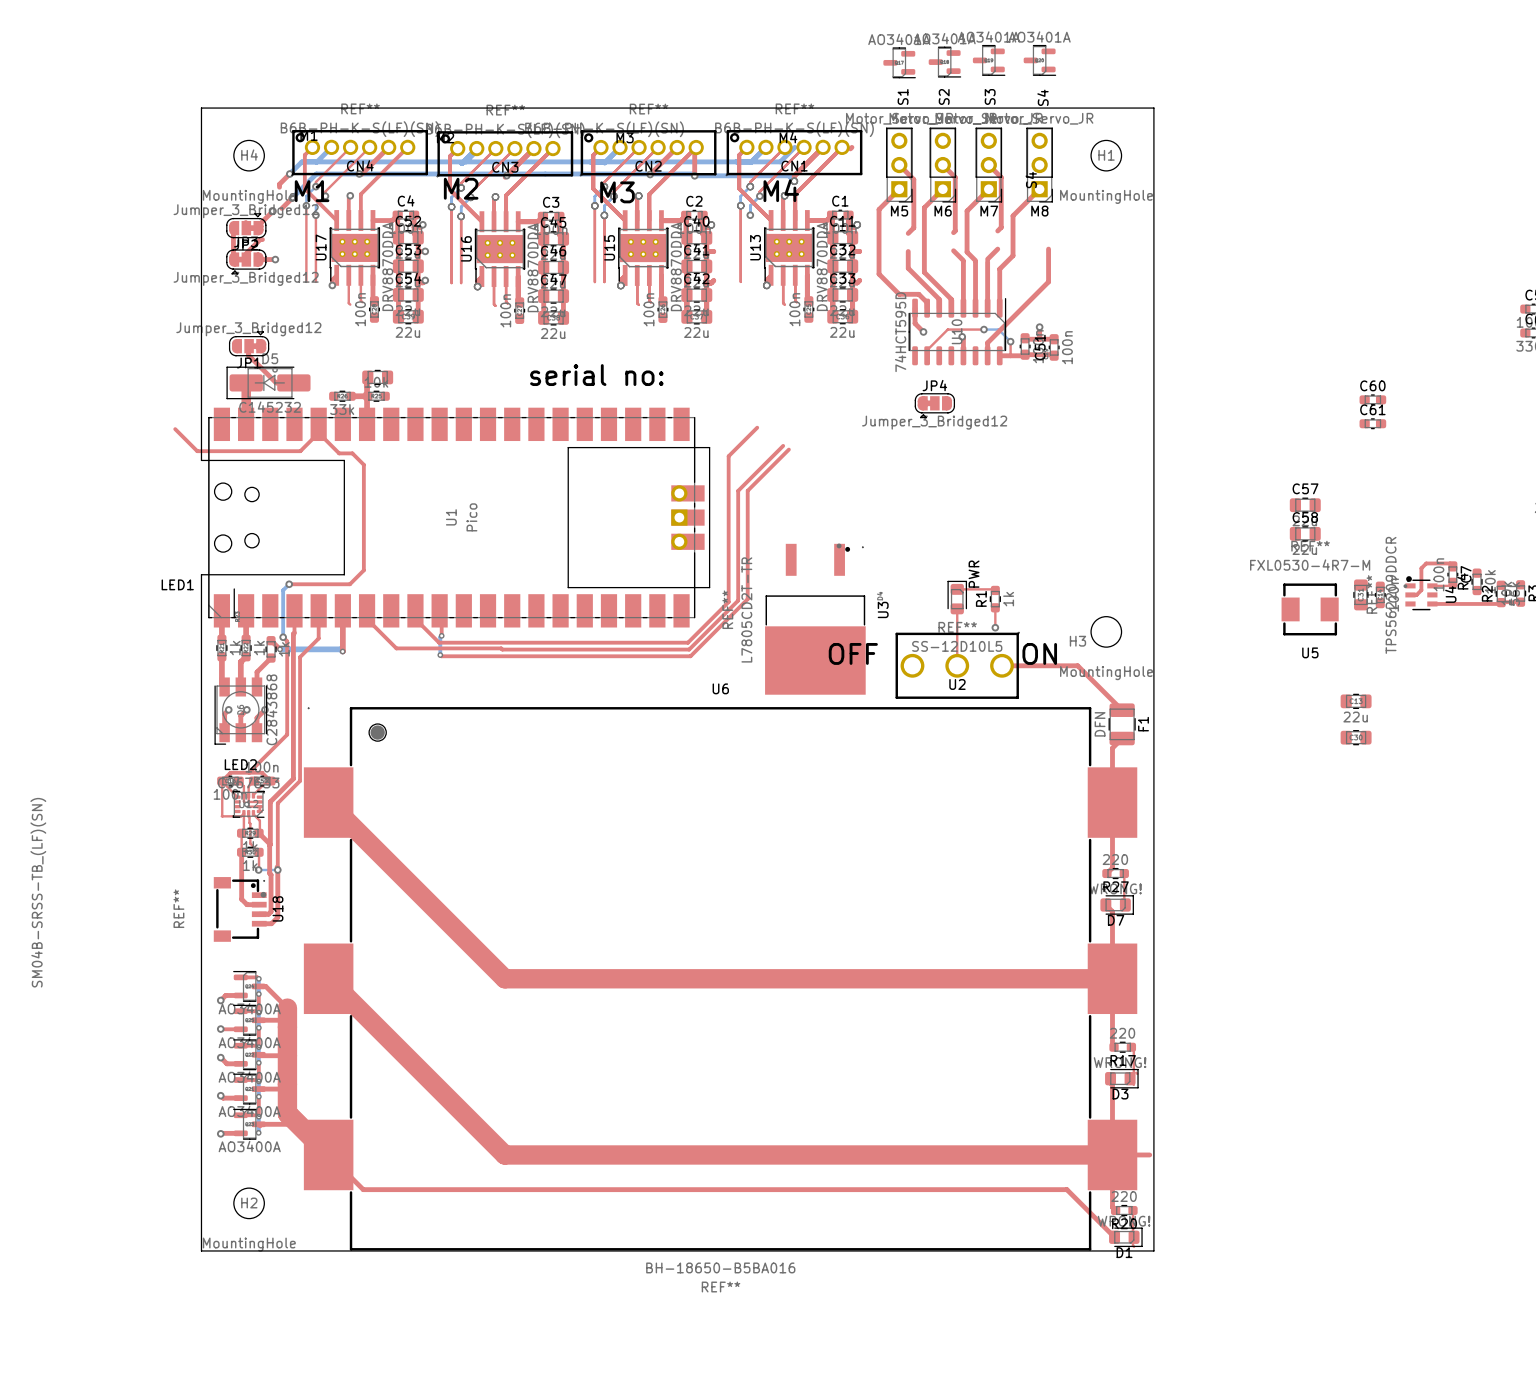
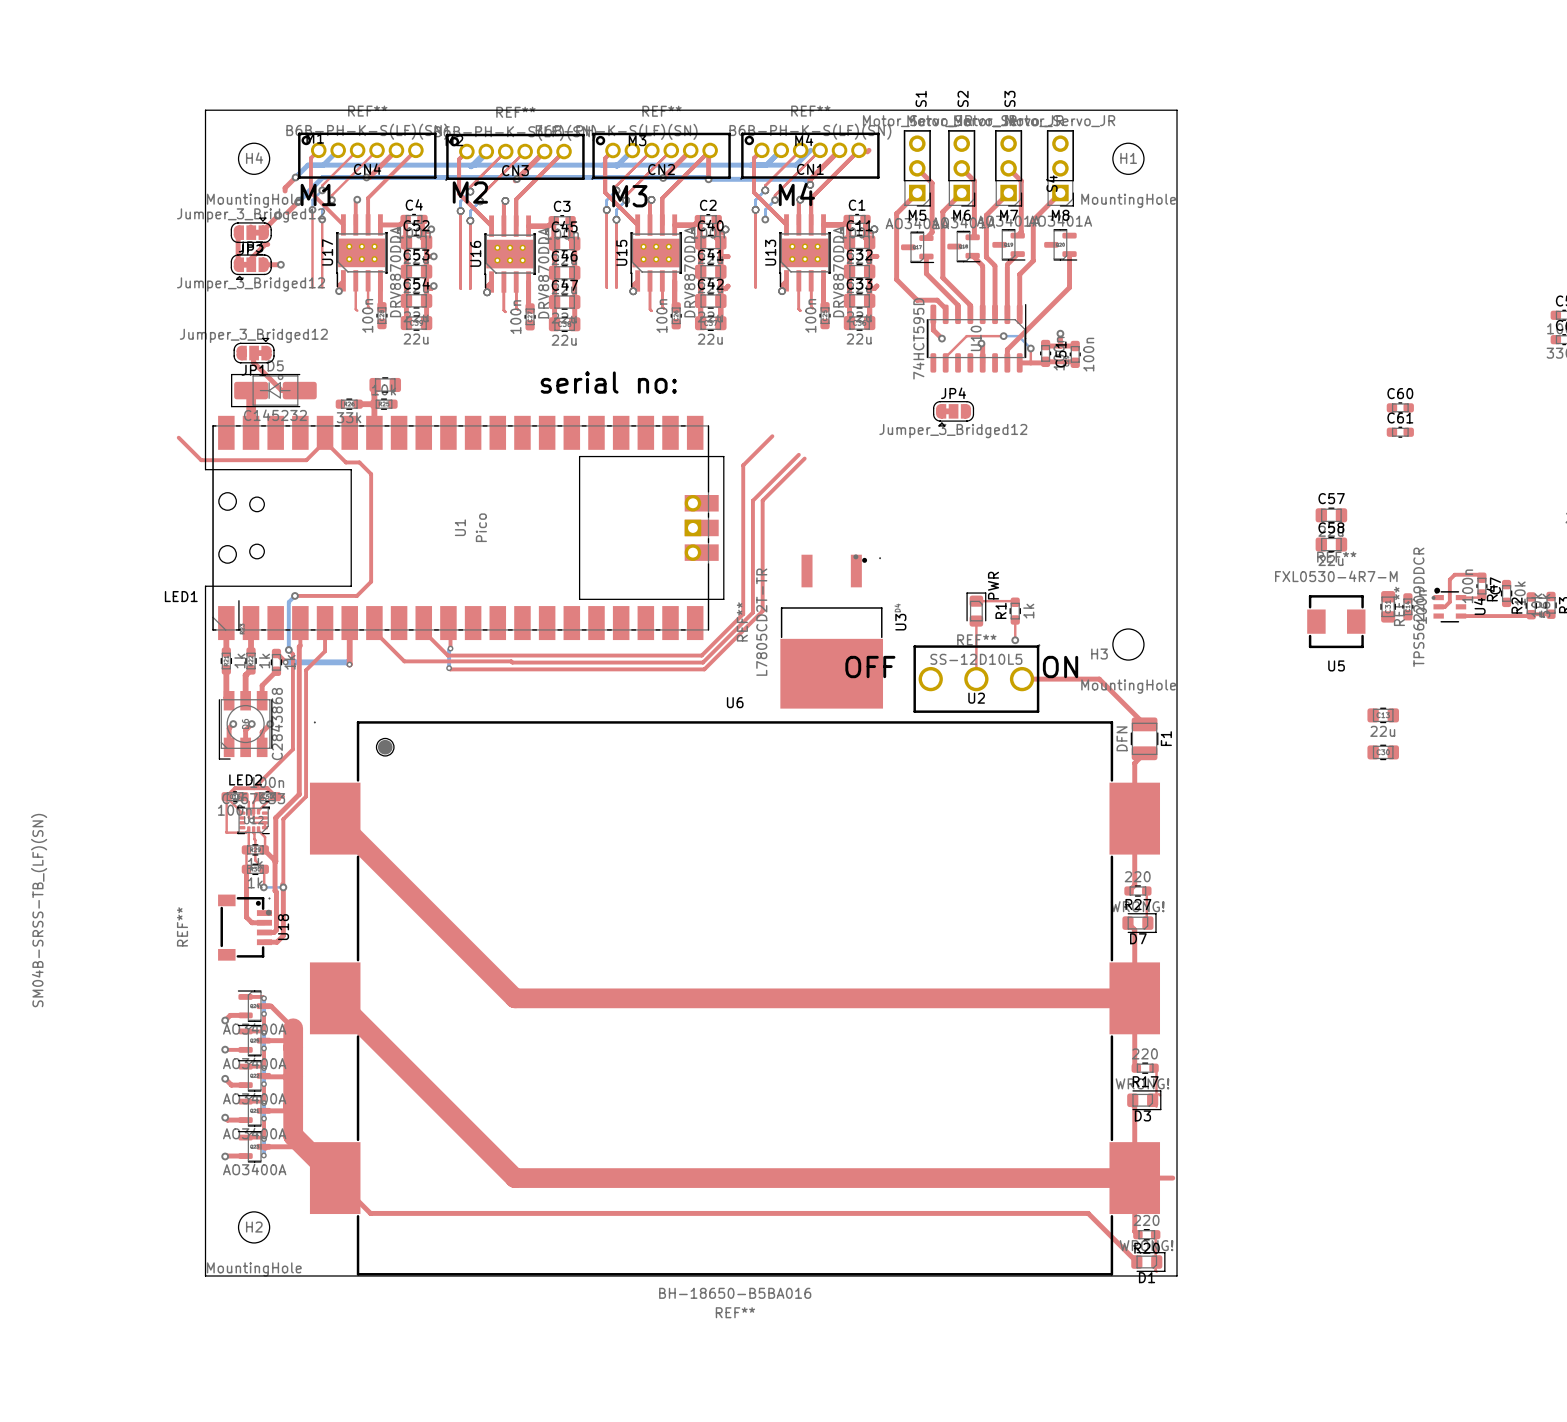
part position: (989, 60) -> (1008, 244)
part position: (1039, 60) -> (1060, 244)
part position: (899, 62) -> (917, 247)
part position: (944, 62) -> (963, 246)
text: S4 (1043, 97) -> none

